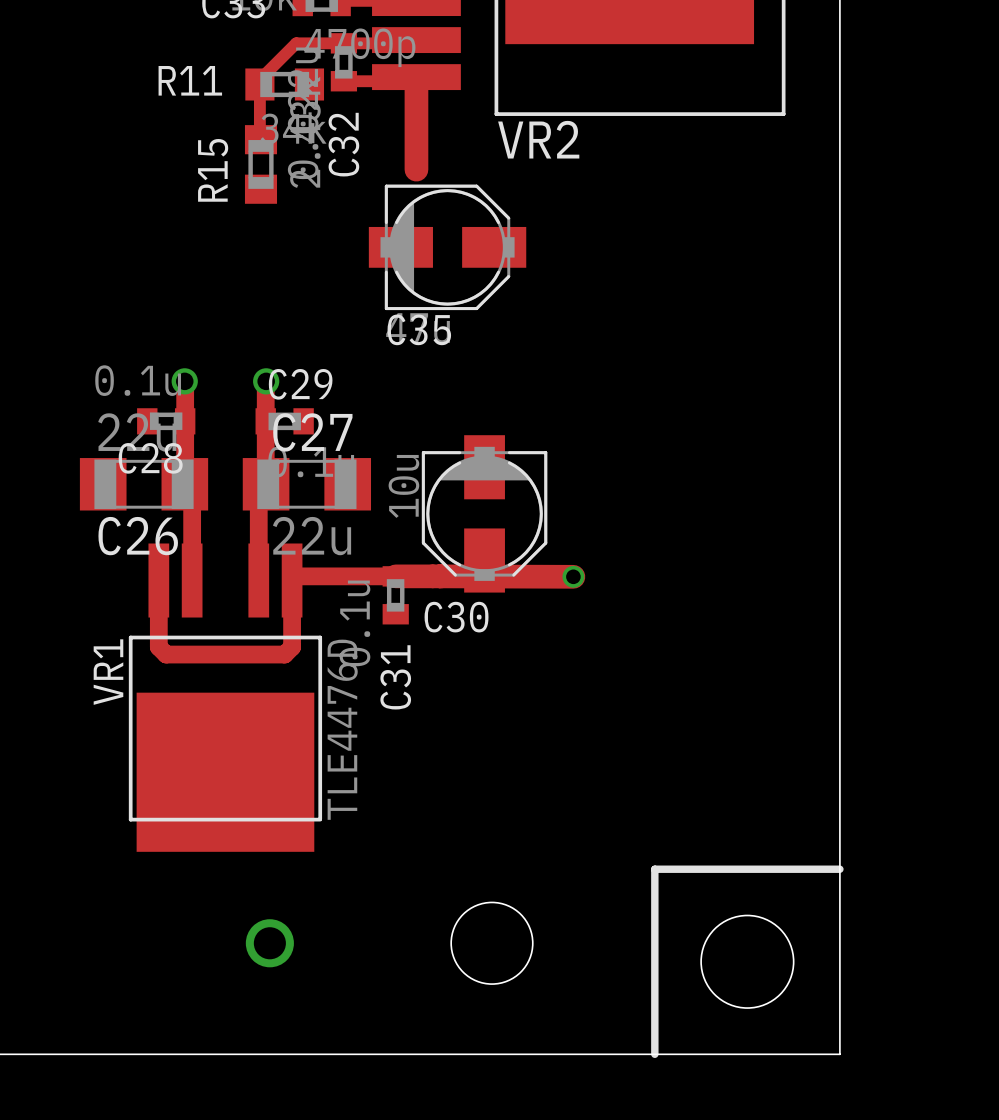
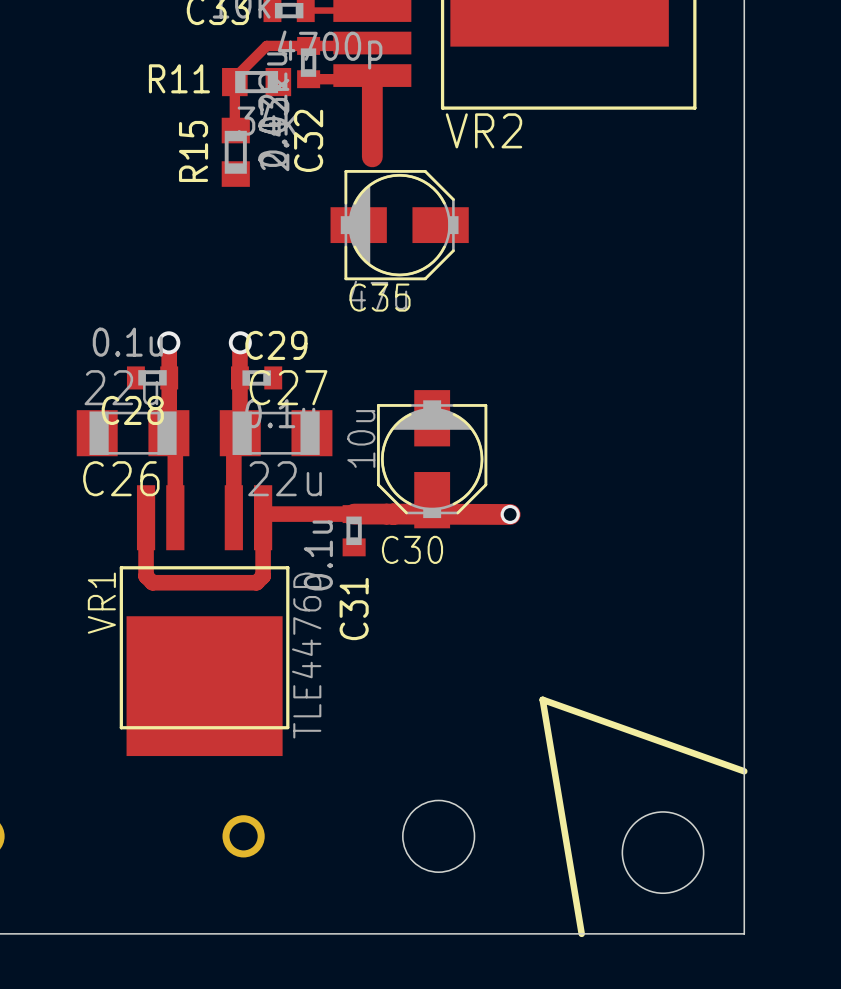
line: (839, 869) (654, 869) (654, 1054) -> (744, 771) (542, 699) (581, 933)

